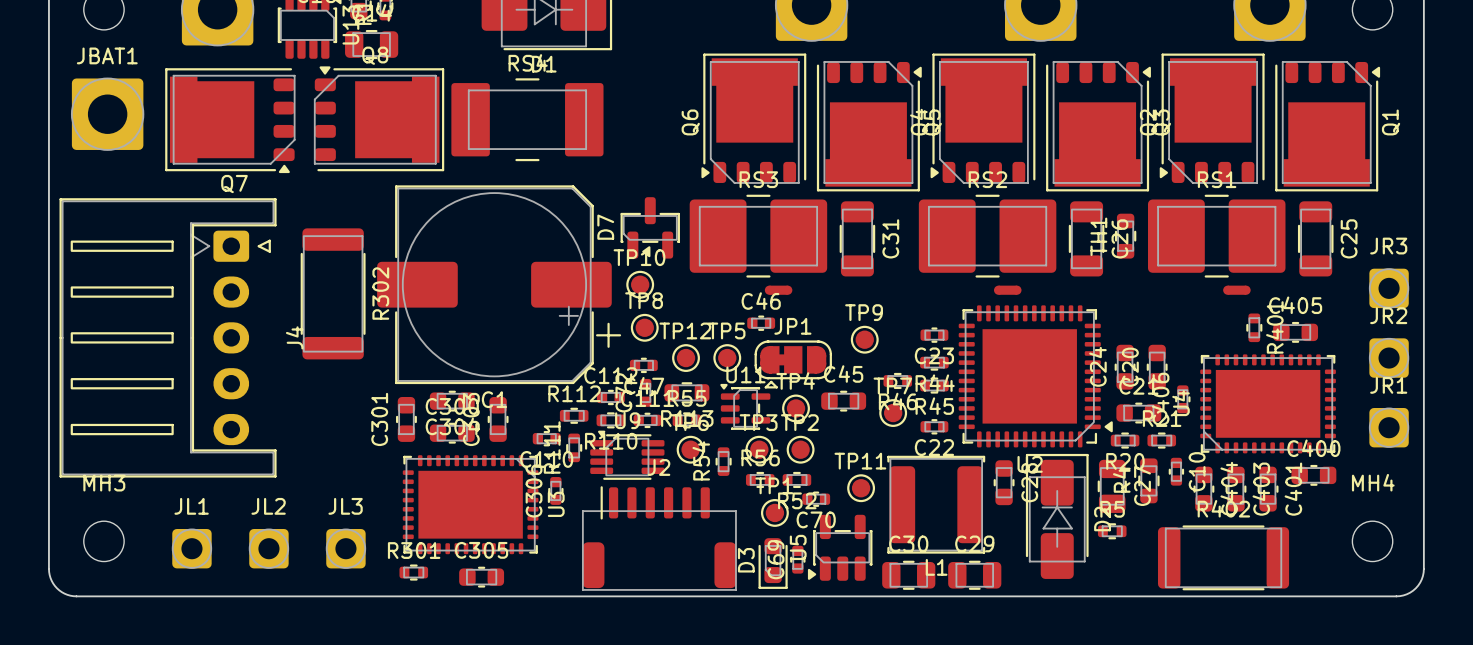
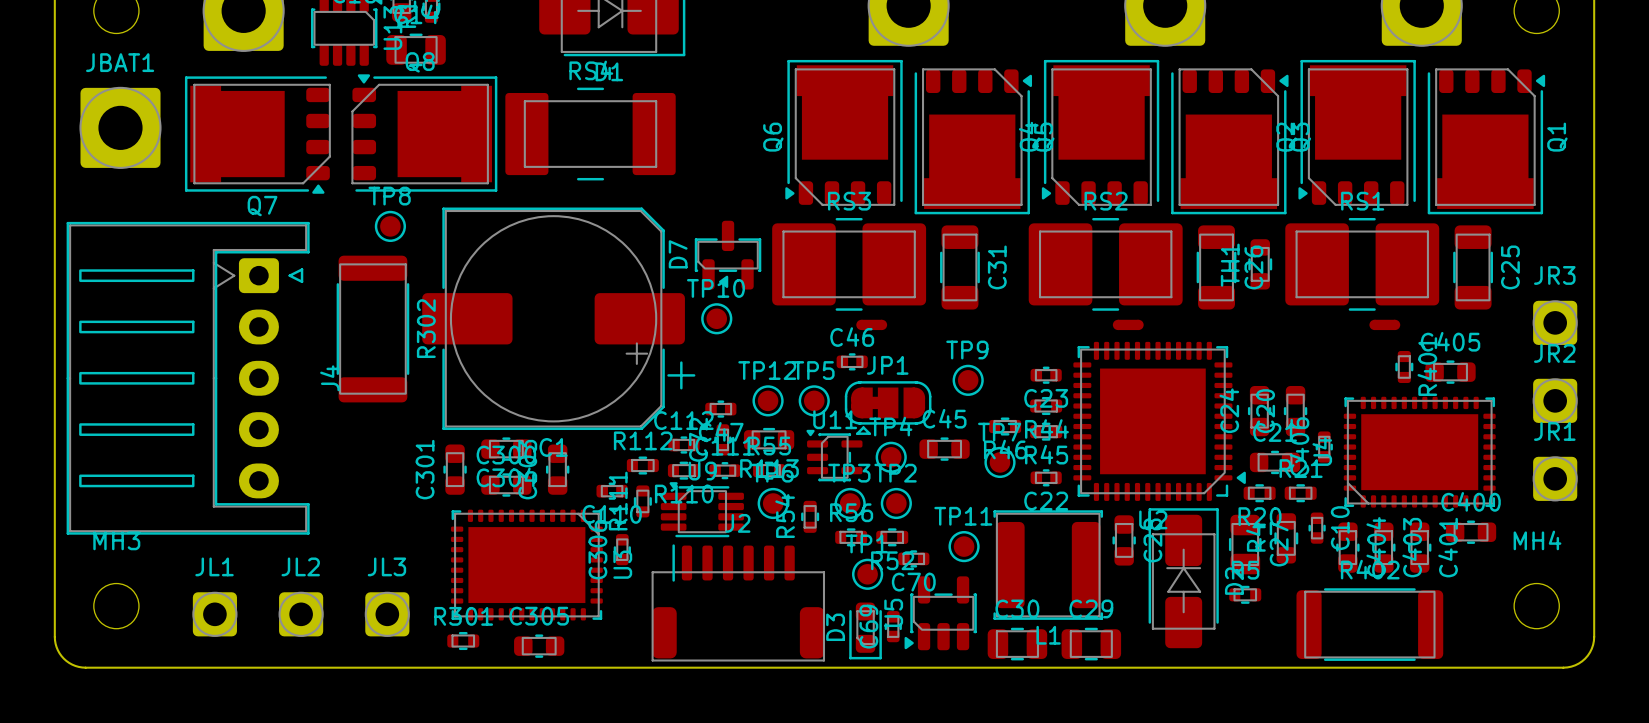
TP8 position: (644, 327) -> (390, 226)

